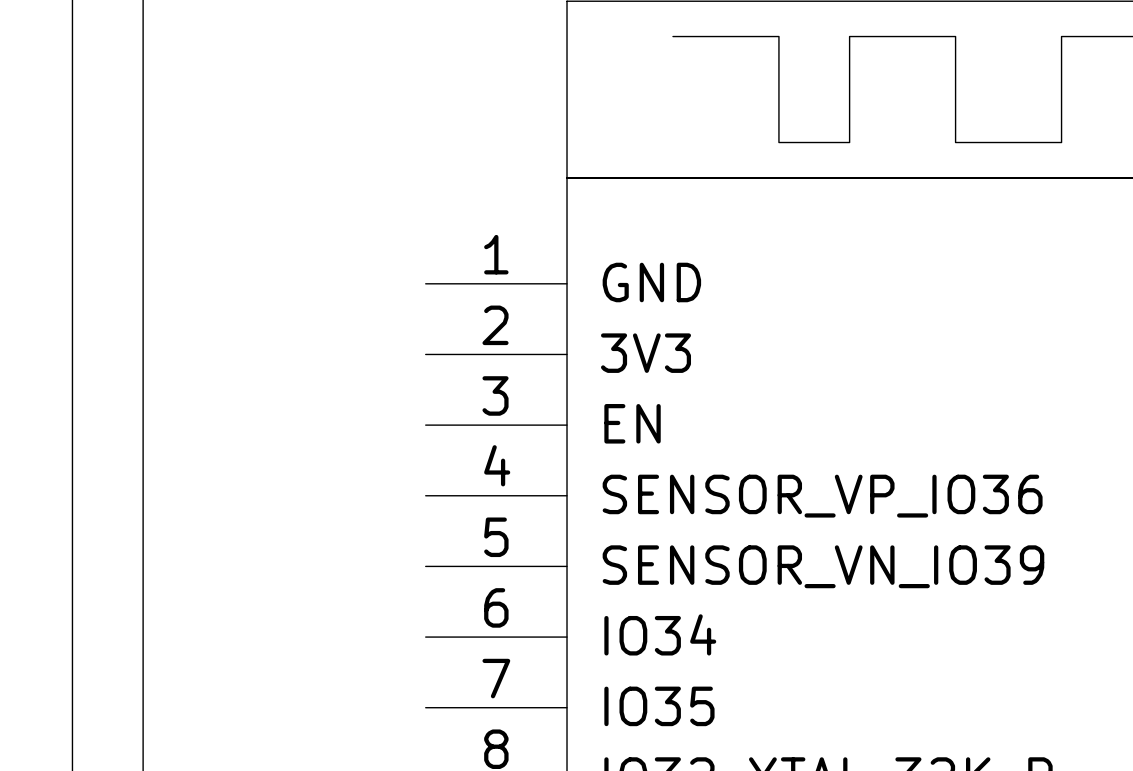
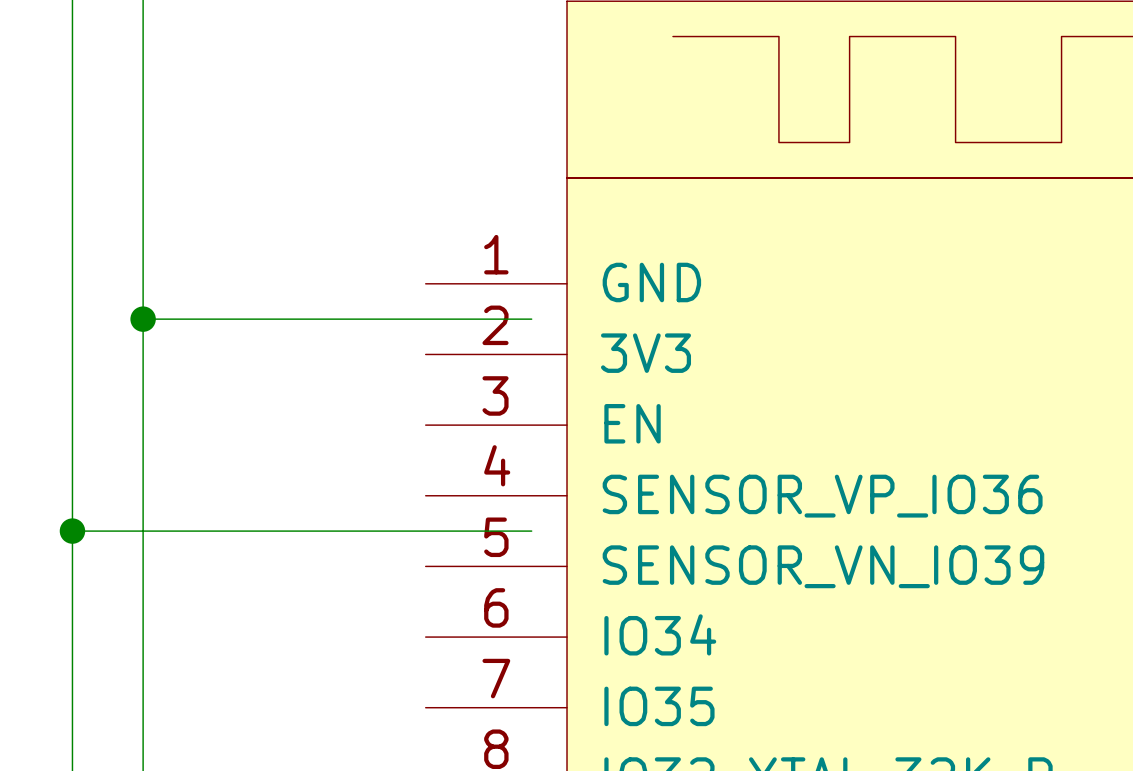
wire: none -> (143, 319) (531, 319)
junction: none -> (143, 319)
wire: none -> (72, 531) (531, 531)
junction: none -> (72, 531)

